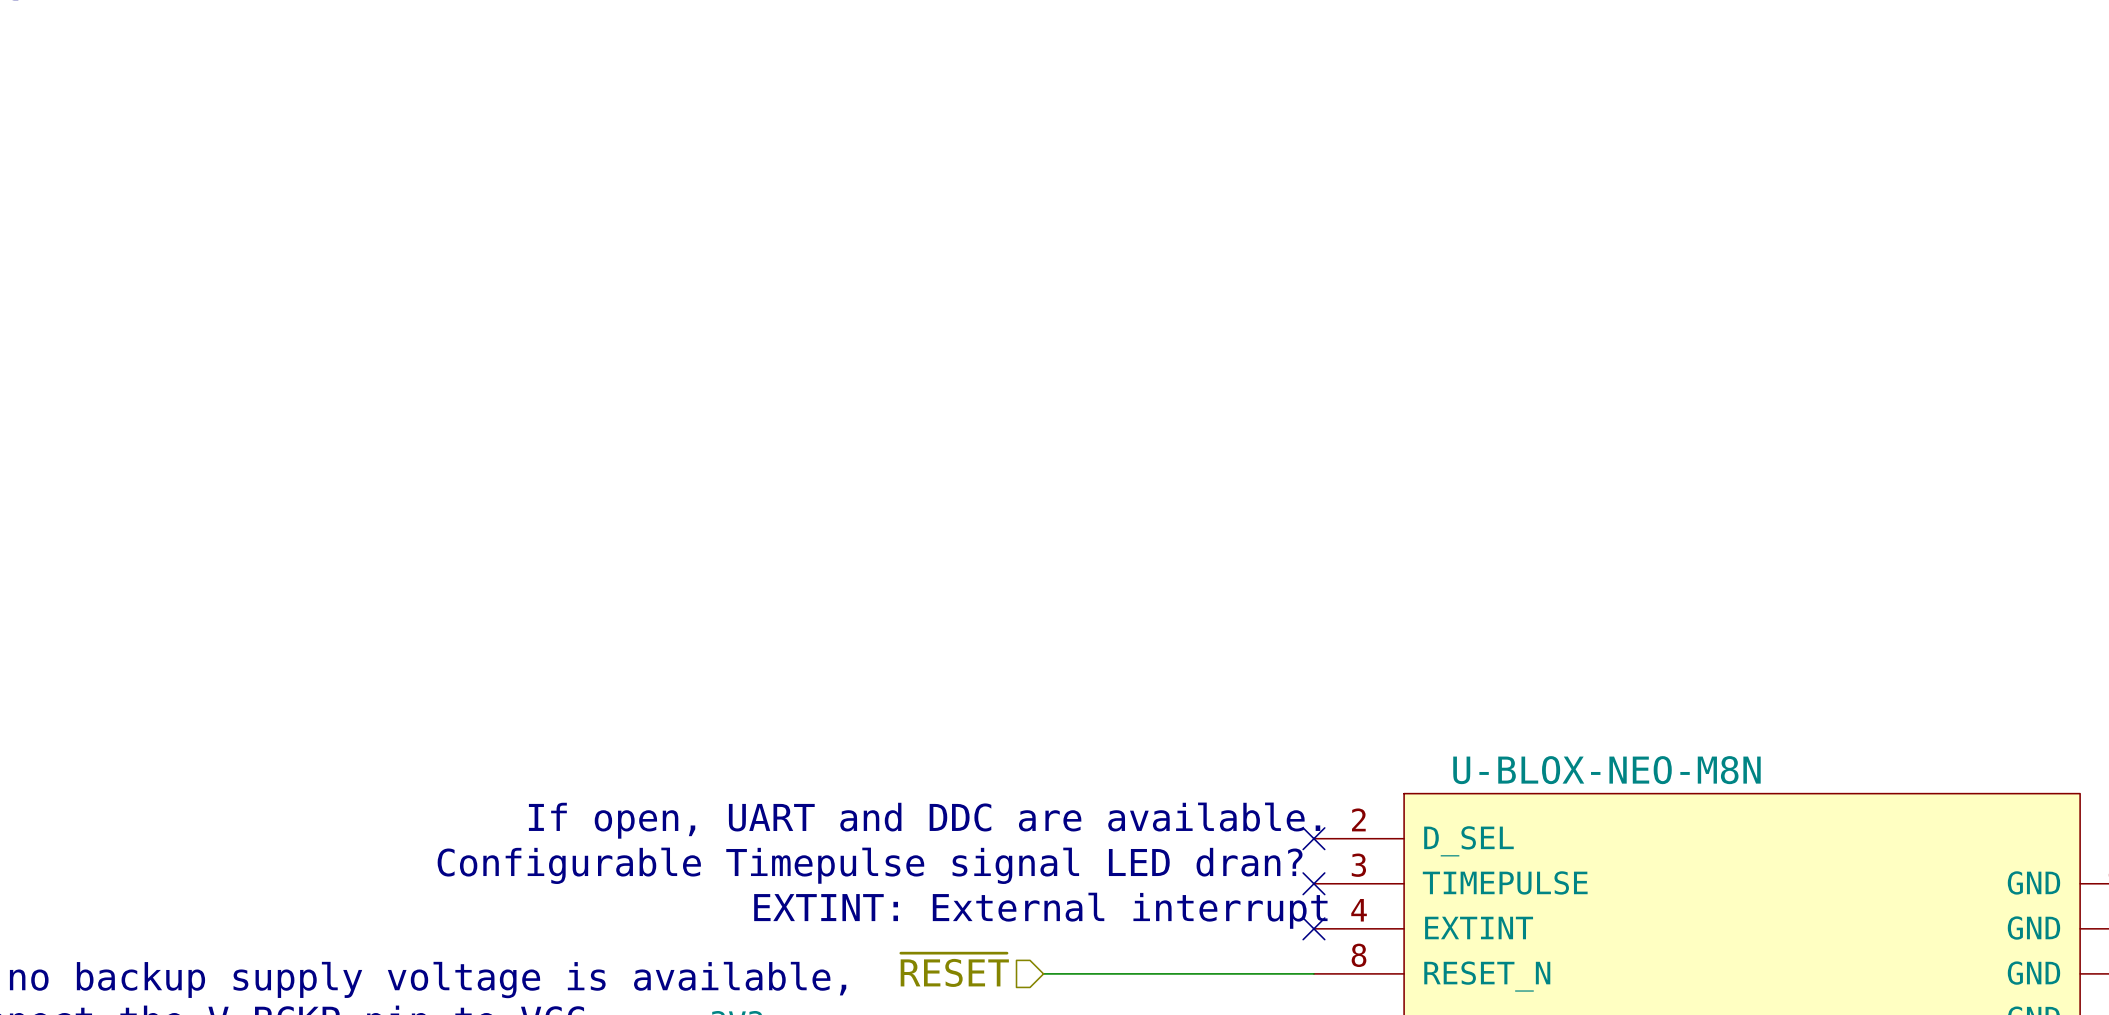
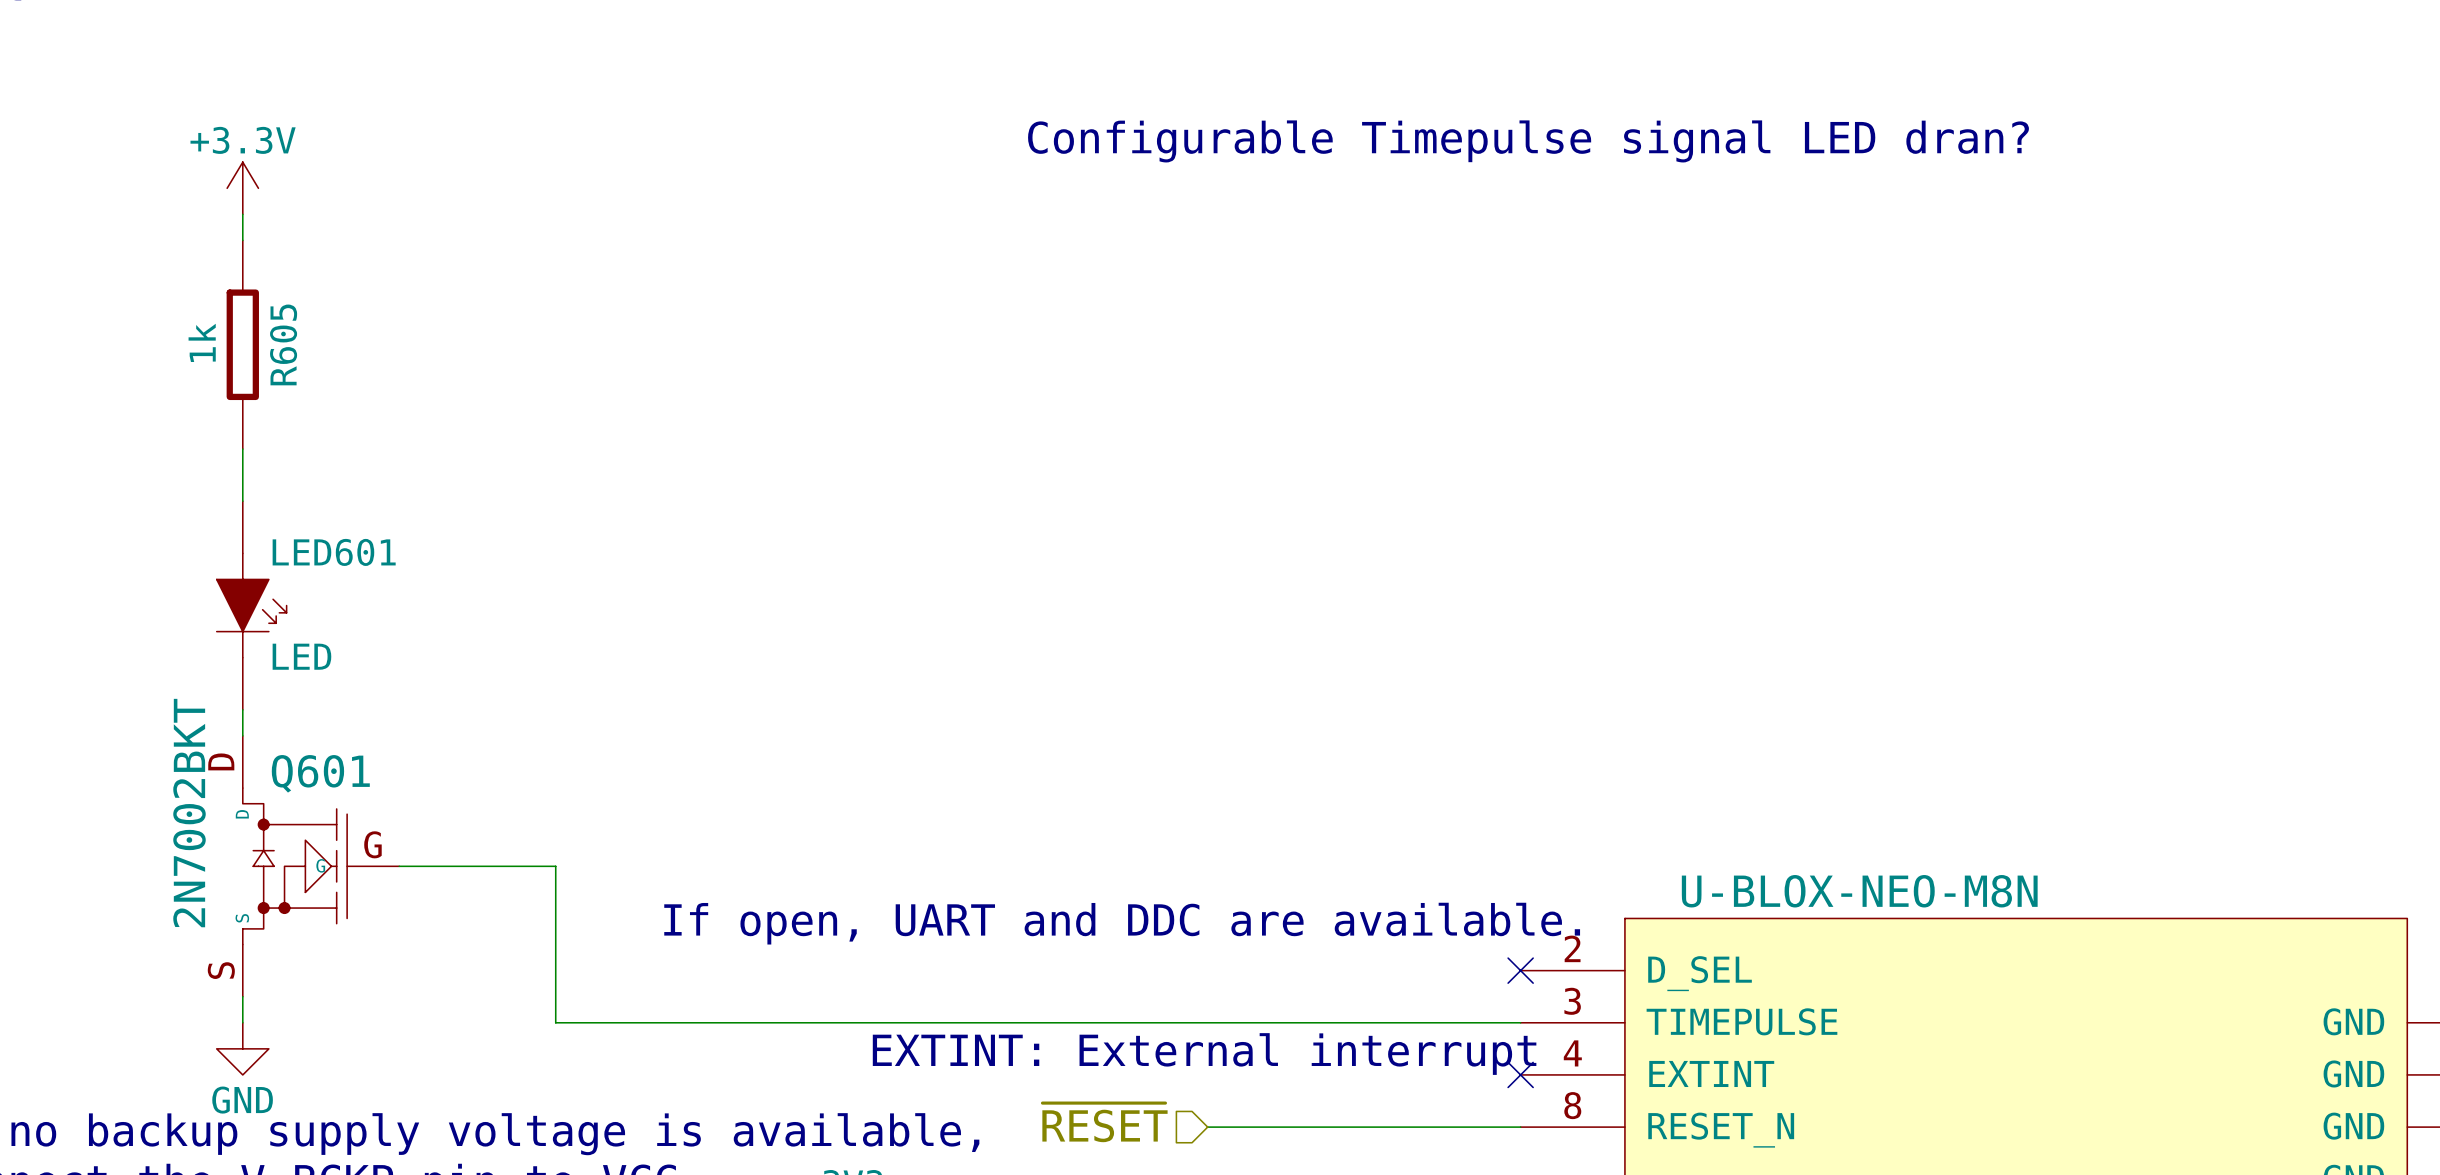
text: none -> Configurable Timepulse signal LED dran? (1528, 141)
power symbol: none -> +3.3V (242, 188)
wire: none -> (242, 214) (242, 240)
R605: none -> 1k (242, 344)
wire: none -> (242, 449) (242, 501)
LED601: none -> LED (251, 605)
wire: none -> (242, 709) (242, 735)
Q601: none -> 2N7002BKT (321, 866)
wire: none -> (399, 866) (555, 866) (555, 1022) (1520, 1022)
text position: If open, UART and DDC are available. (924, 820) -> If open, UART and DDC are available. (1122, 923)
wire: none -> (242, 996) (242, 1022)
text: Configurable Timepulse signal LED dran? (870, 865) -> none
no-connect mark: (1313, 883) -> none
power symbol: none -> GND (242, 1048)

